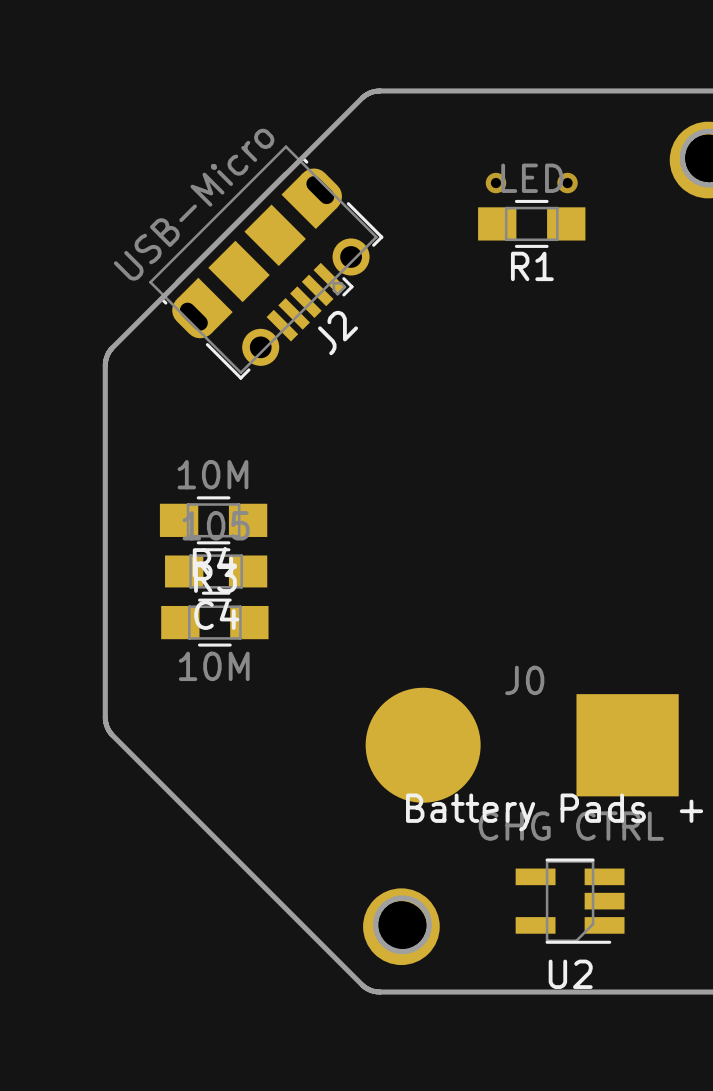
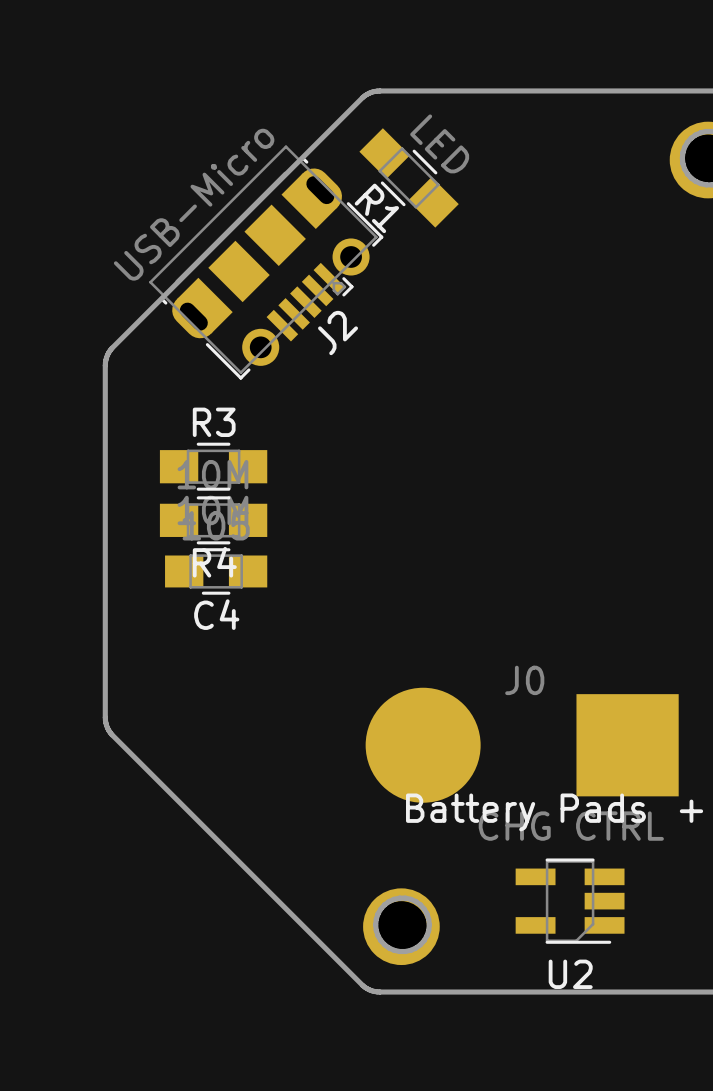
via: (495, 183) -> none
via: (567, 183) -> none
R1 rotation: 0° (531, 223) -> 45° clockwise (409, 177)
R1 position: (531, 223) -> (409, 177)
R3 position: (214, 622) -> (213, 466)

